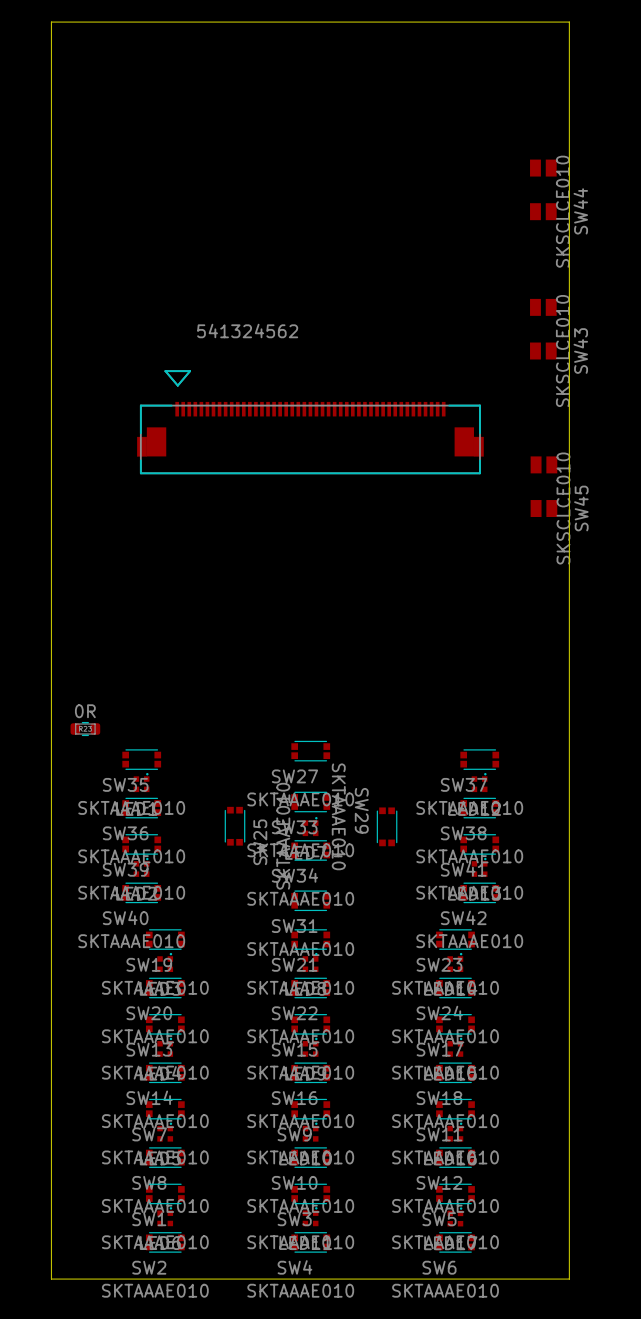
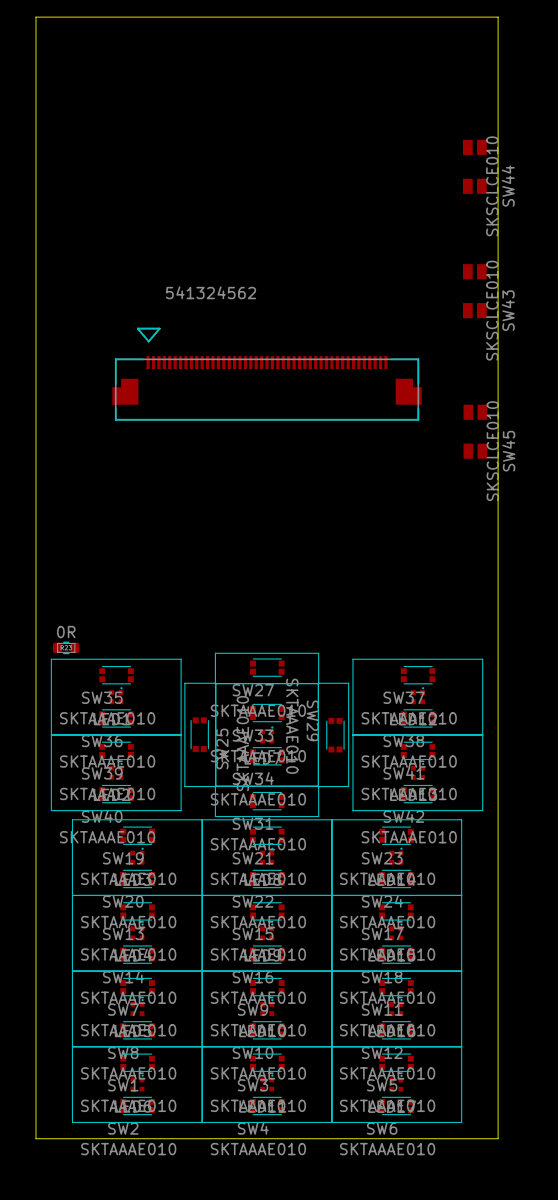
line: none -> (215, 653) (215, 683) (318, 683) (318, 653) (215, 653)
line: none -> (51, 659) (181, 659) (181, 810) (51, 810) (51, 659)
line: none -> (352, 659) (482, 659) (482, 810) (352, 810) (352, 659)
line: none -> (184, 683) (215, 683) (215, 786) (184, 786) (184, 683)
line: none -> (318, 683) (318, 786) (348, 786) (348, 683) (318, 683)
line: none -> (51, 734) (181, 734)
line: none -> (352, 734) (482, 734)
line: none -> (215, 786) (318, 786) (318, 816) (215, 816) (215, 786)
line: none -> (72, 819) (72, 1122) (461, 1122) (461, 819) (72, 819)
line: none -> (202, 819) (202, 1122)
line: none -> (331, 819) (331, 1122)
line: none -> (72, 895) (461, 895)
line: none -> (72, 971) (461, 971)
line: none -> (72, 1046) (461, 1046)

